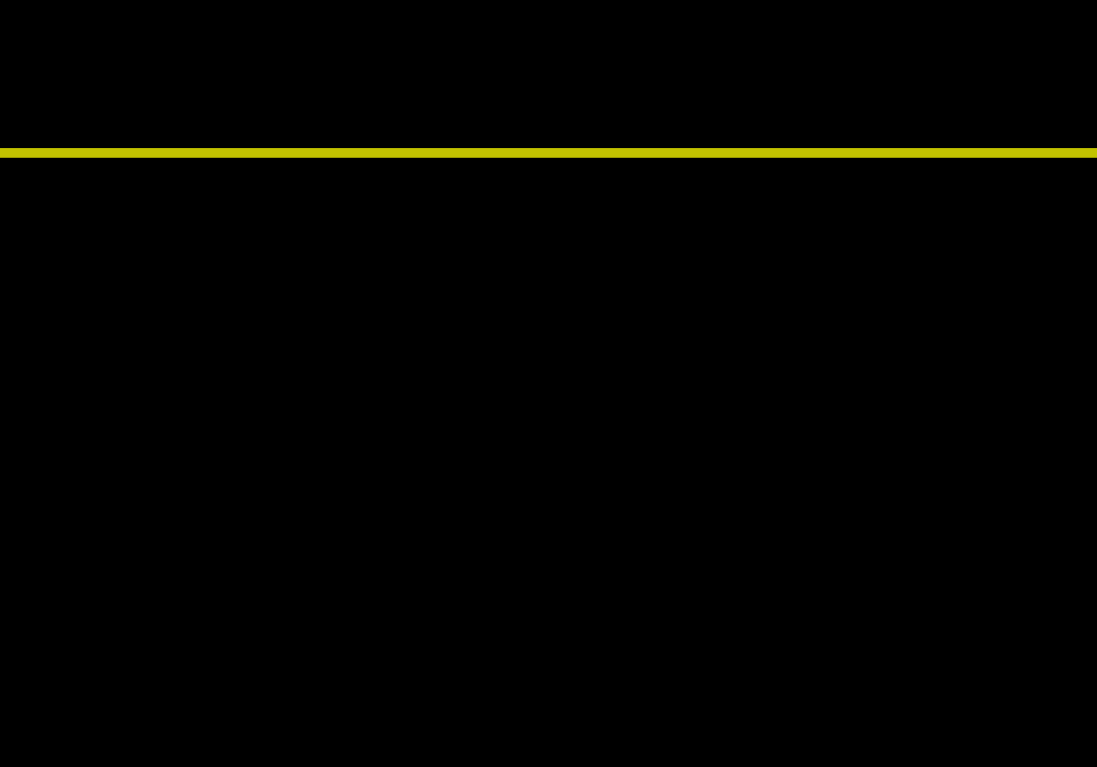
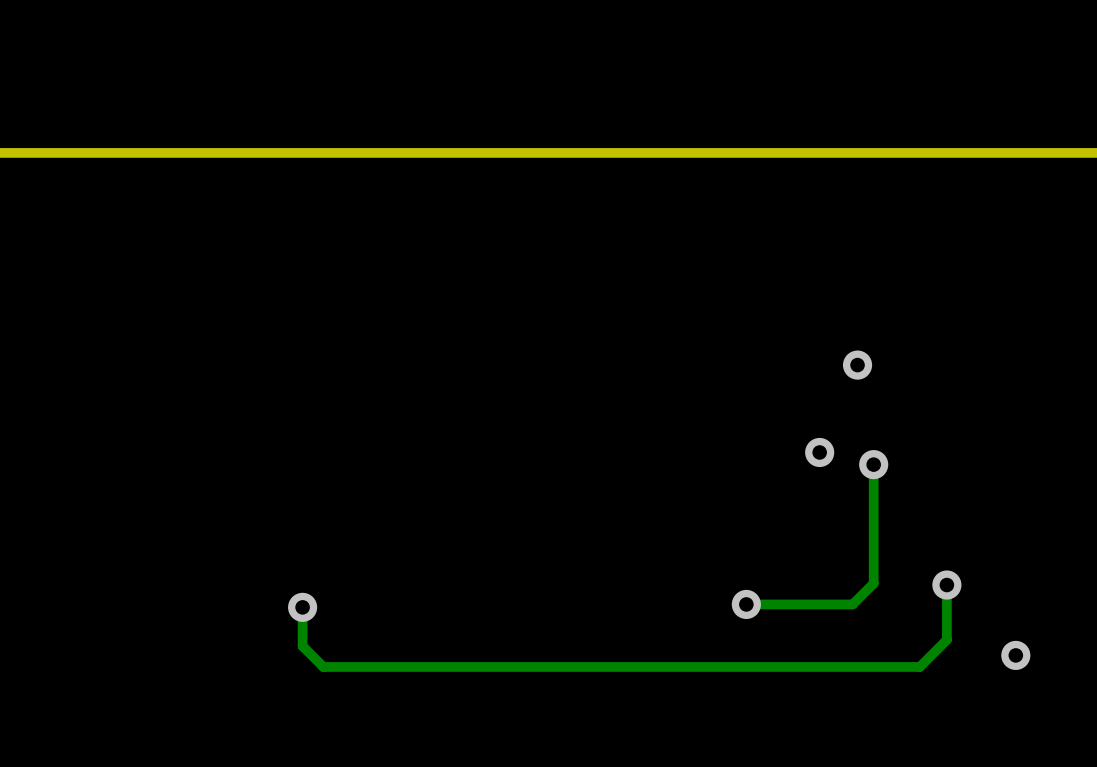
via: none -> (857, 365)
via: none -> (819, 452)
track: none -> (873, 464) (873, 583) (852, 604) (746, 604)
via: none -> (873, 464)
track: none -> (946, 585) (946, 639) (919, 666) (323, 666) (302, 646) (302, 607)
via: none -> (946, 585)
via: none -> (746, 604)
via: none -> (302, 607)
via: none -> (1015, 655)

